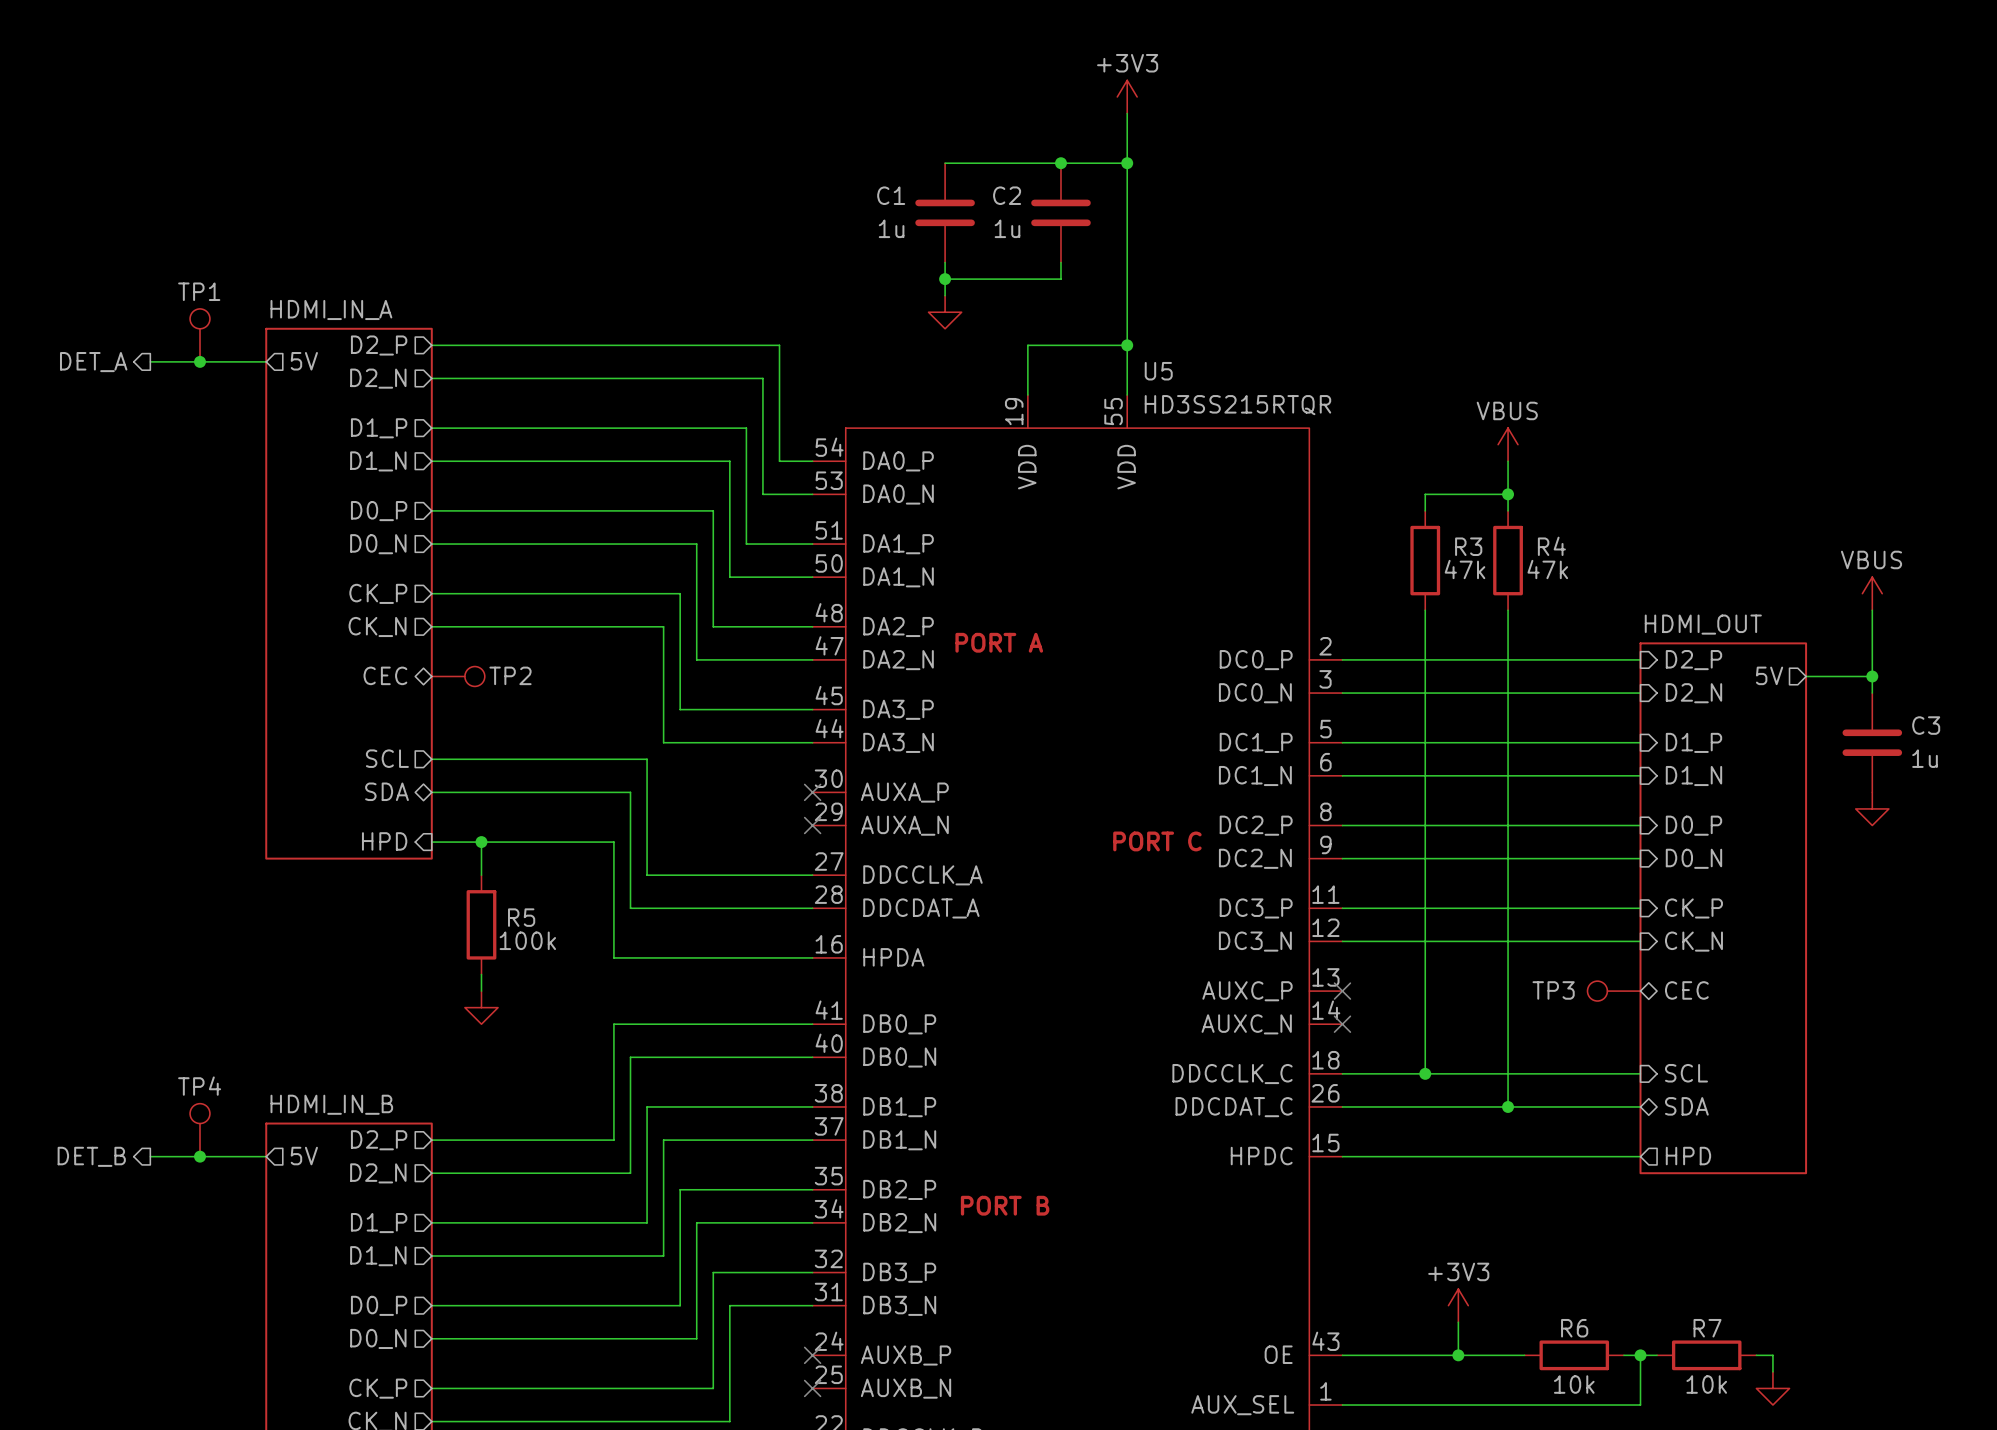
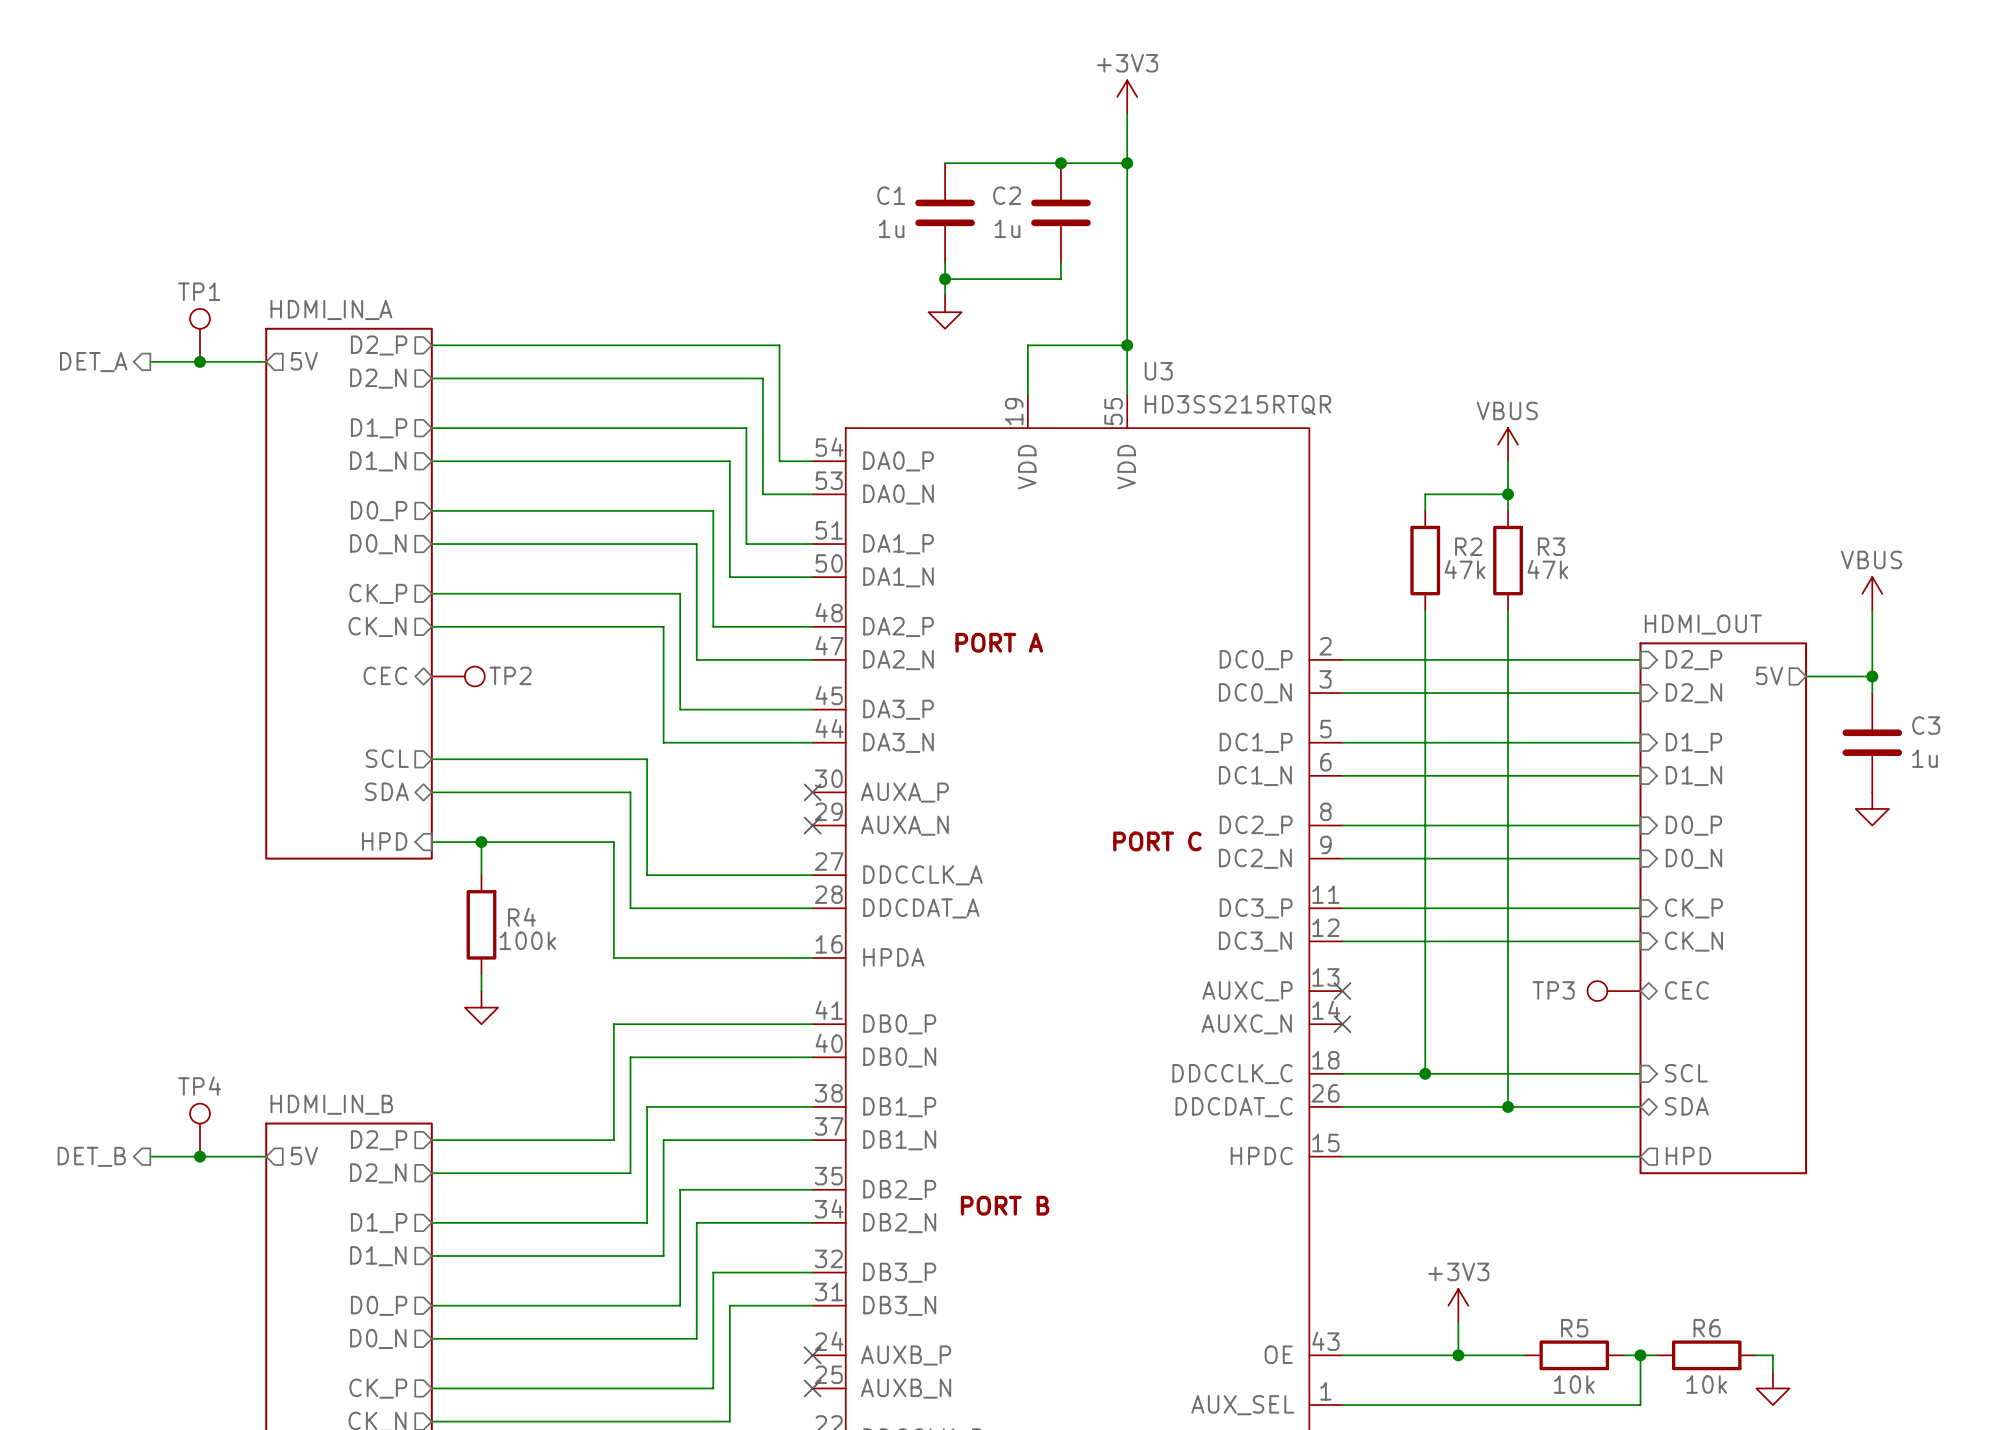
U5 name: U5 (1158, 371) -> U3 (1158, 371)
R3 name: R3 (1468, 546) -> R2 (1468, 546)
R4 name: R4 (1551, 546) -> R3 (1551, 546)
R5 name: R5 (521, 917) -> R4 (522, 917)
R6 name: R6 (1574, 1328) -> R5 (1574, 1328)
R7 name: R7 (1707, 1328) -> R6 (1707, 1328)

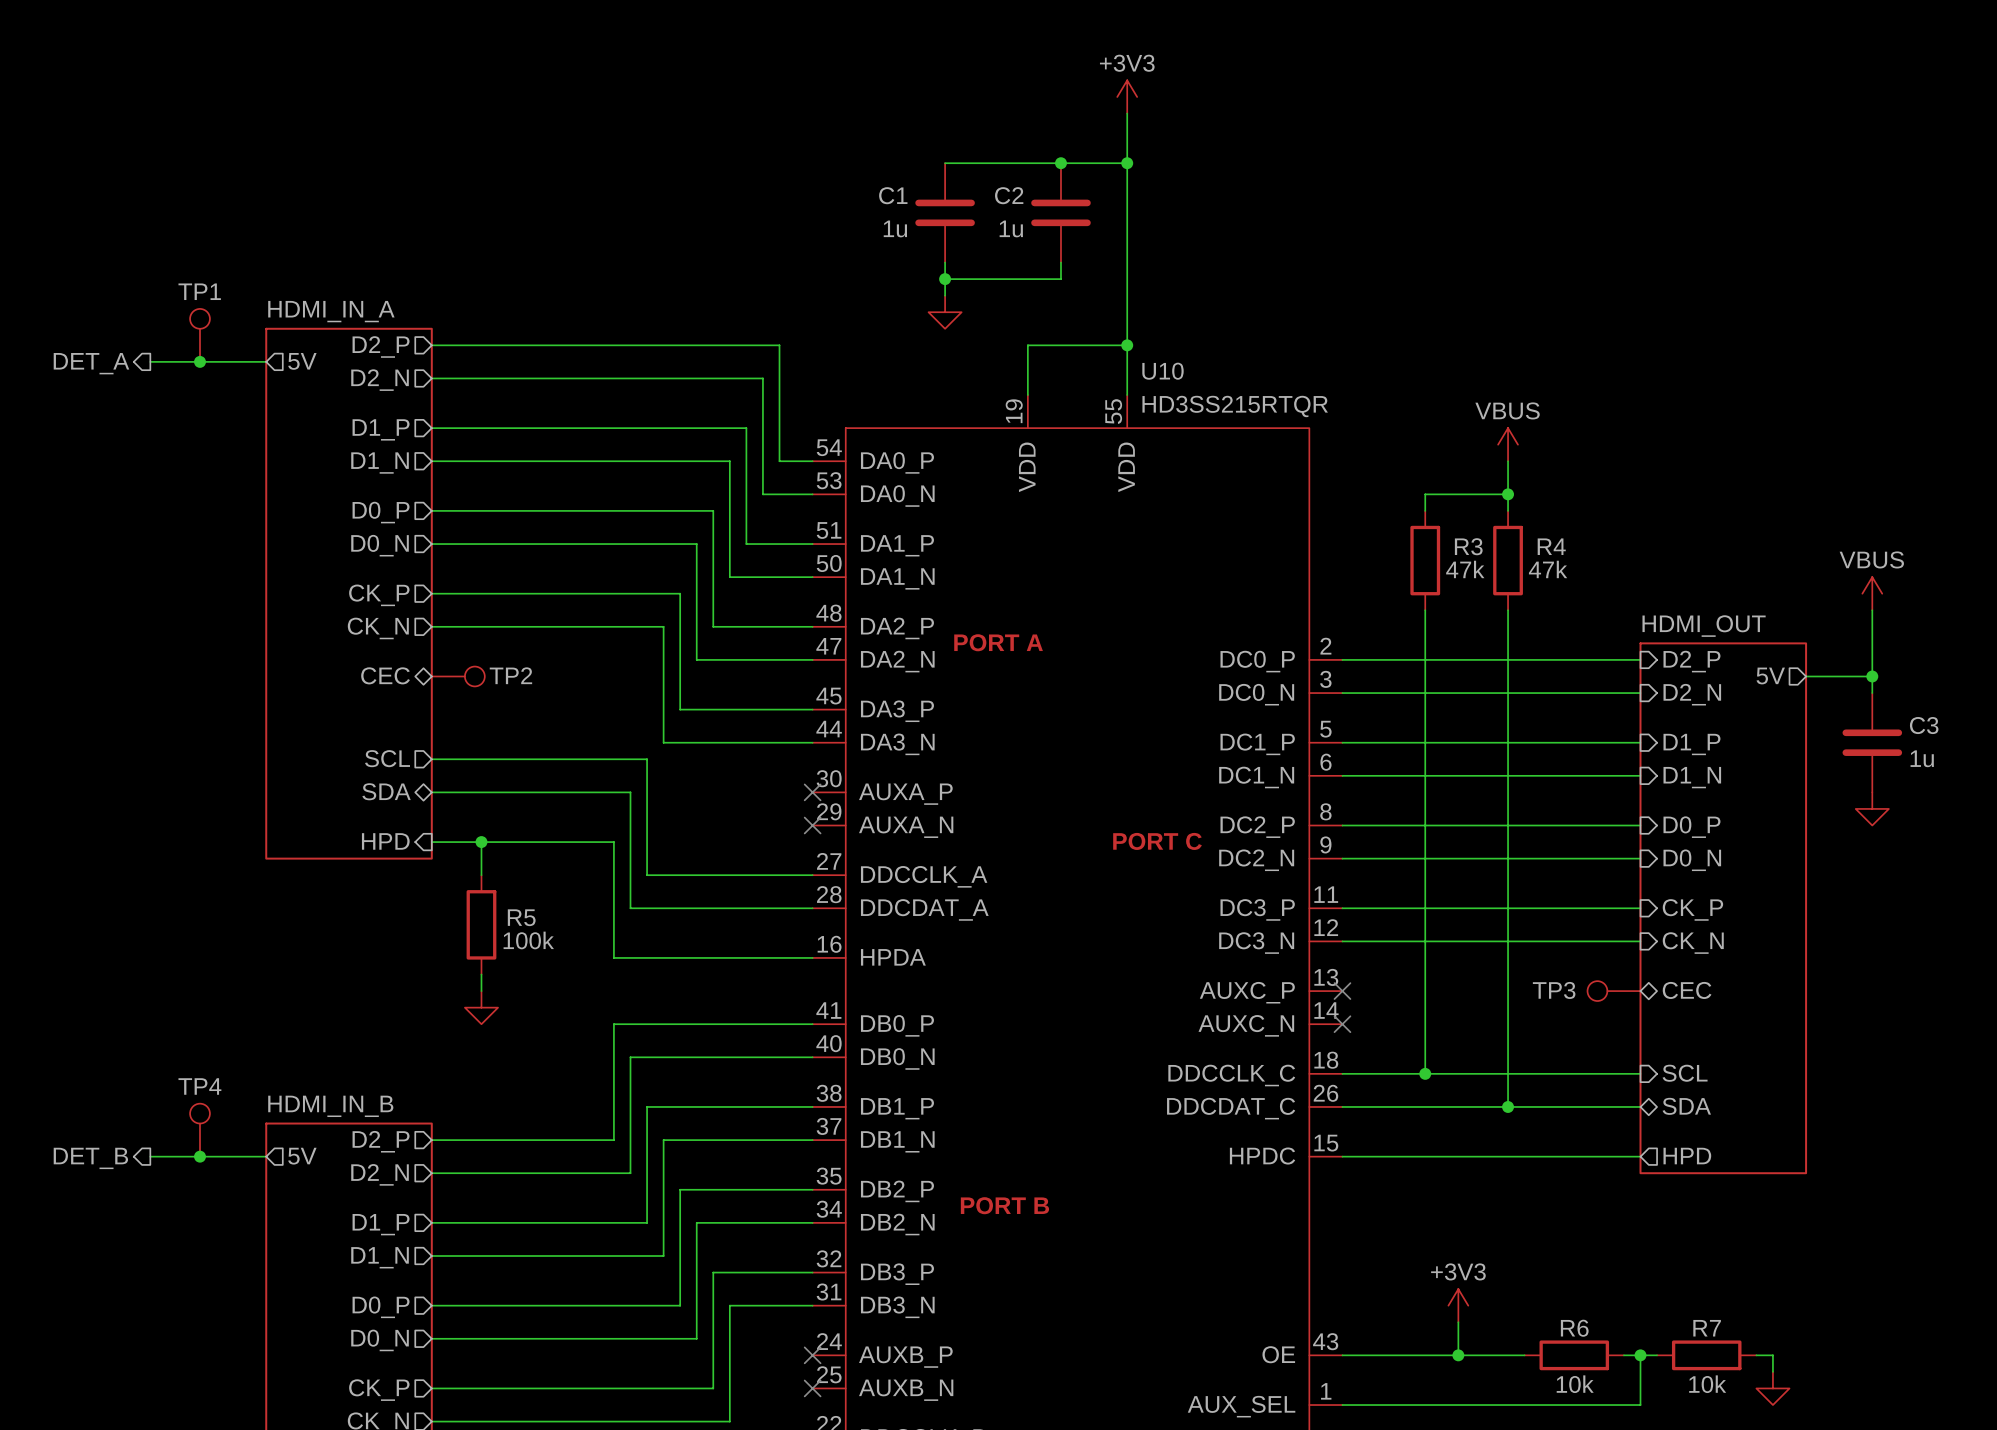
U3 name: U3 (1158, 371) -> U10 (1163, 371)
R2 name: R2 (1468, 546) -> R3 (1468, 546)
R3 name: R3 (1551, 546) -> R4 (1551, 546)
R4 name: R4 (522, 917) -> R5 (521, 917)
R5 name: R5 (1574, 1328) -> R6 (1574, 1328)
R6 name: R6 (1707, 1328) -> R7 (1707, 1328)

